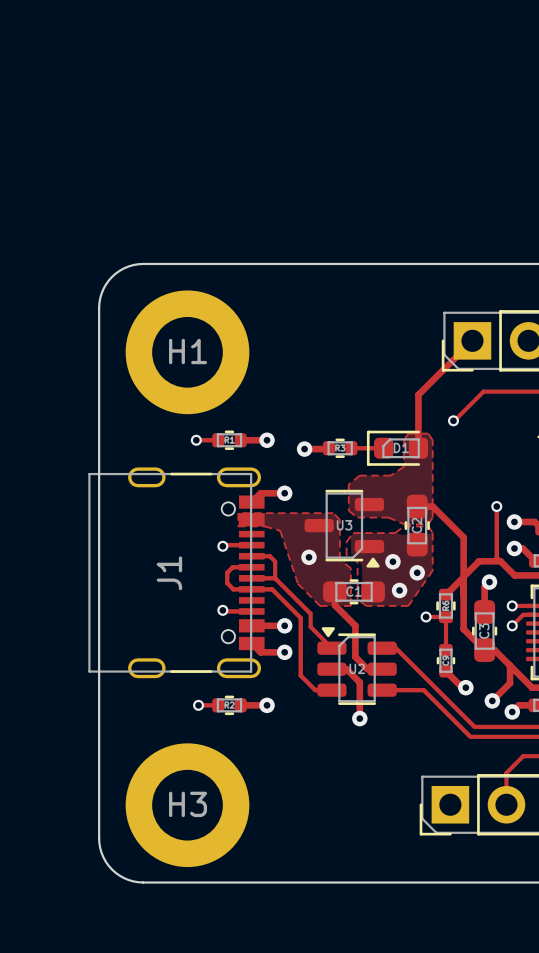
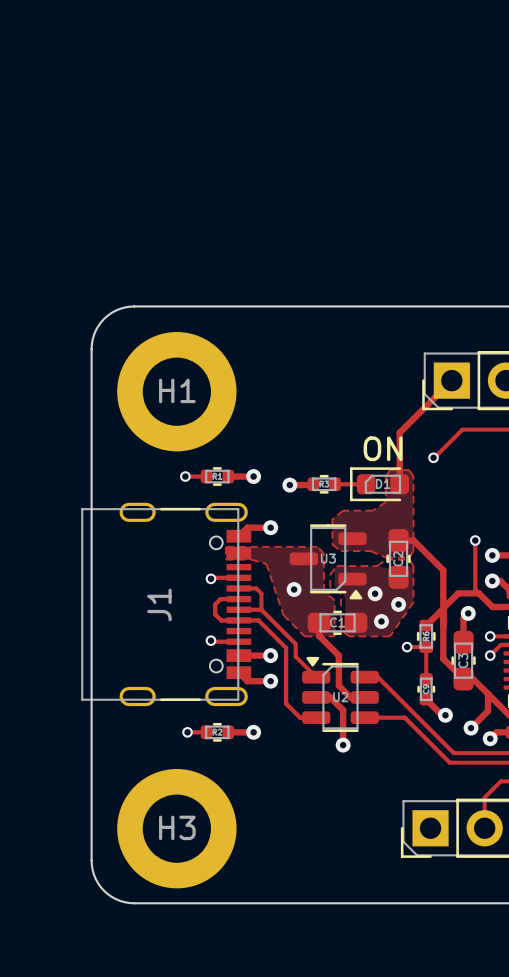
text: none -> ON (383, 448)

